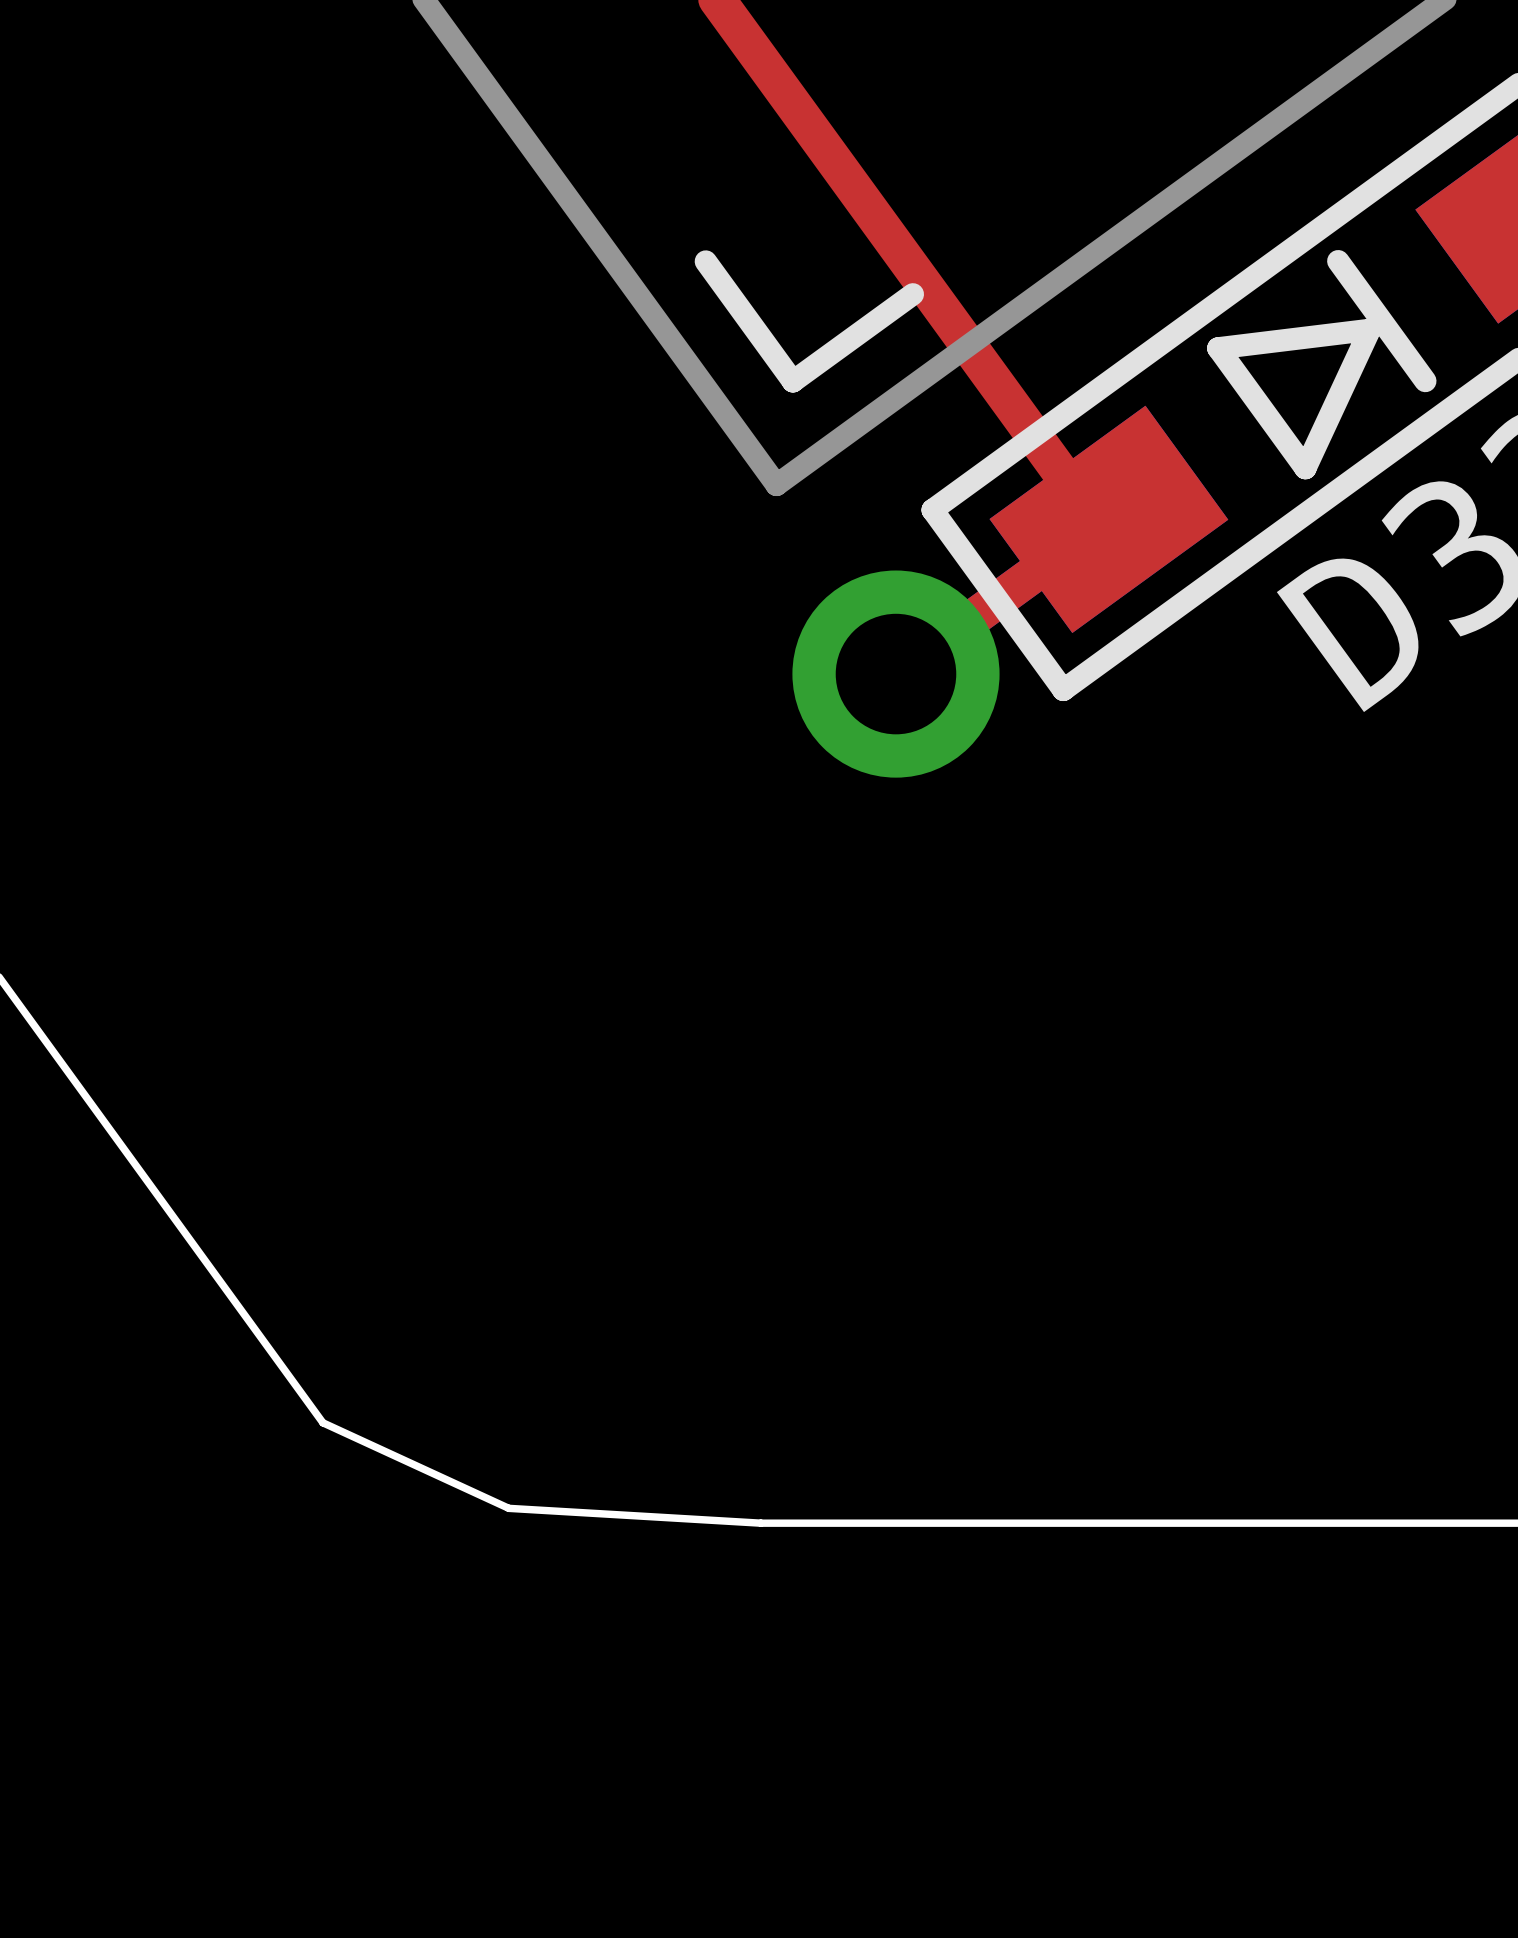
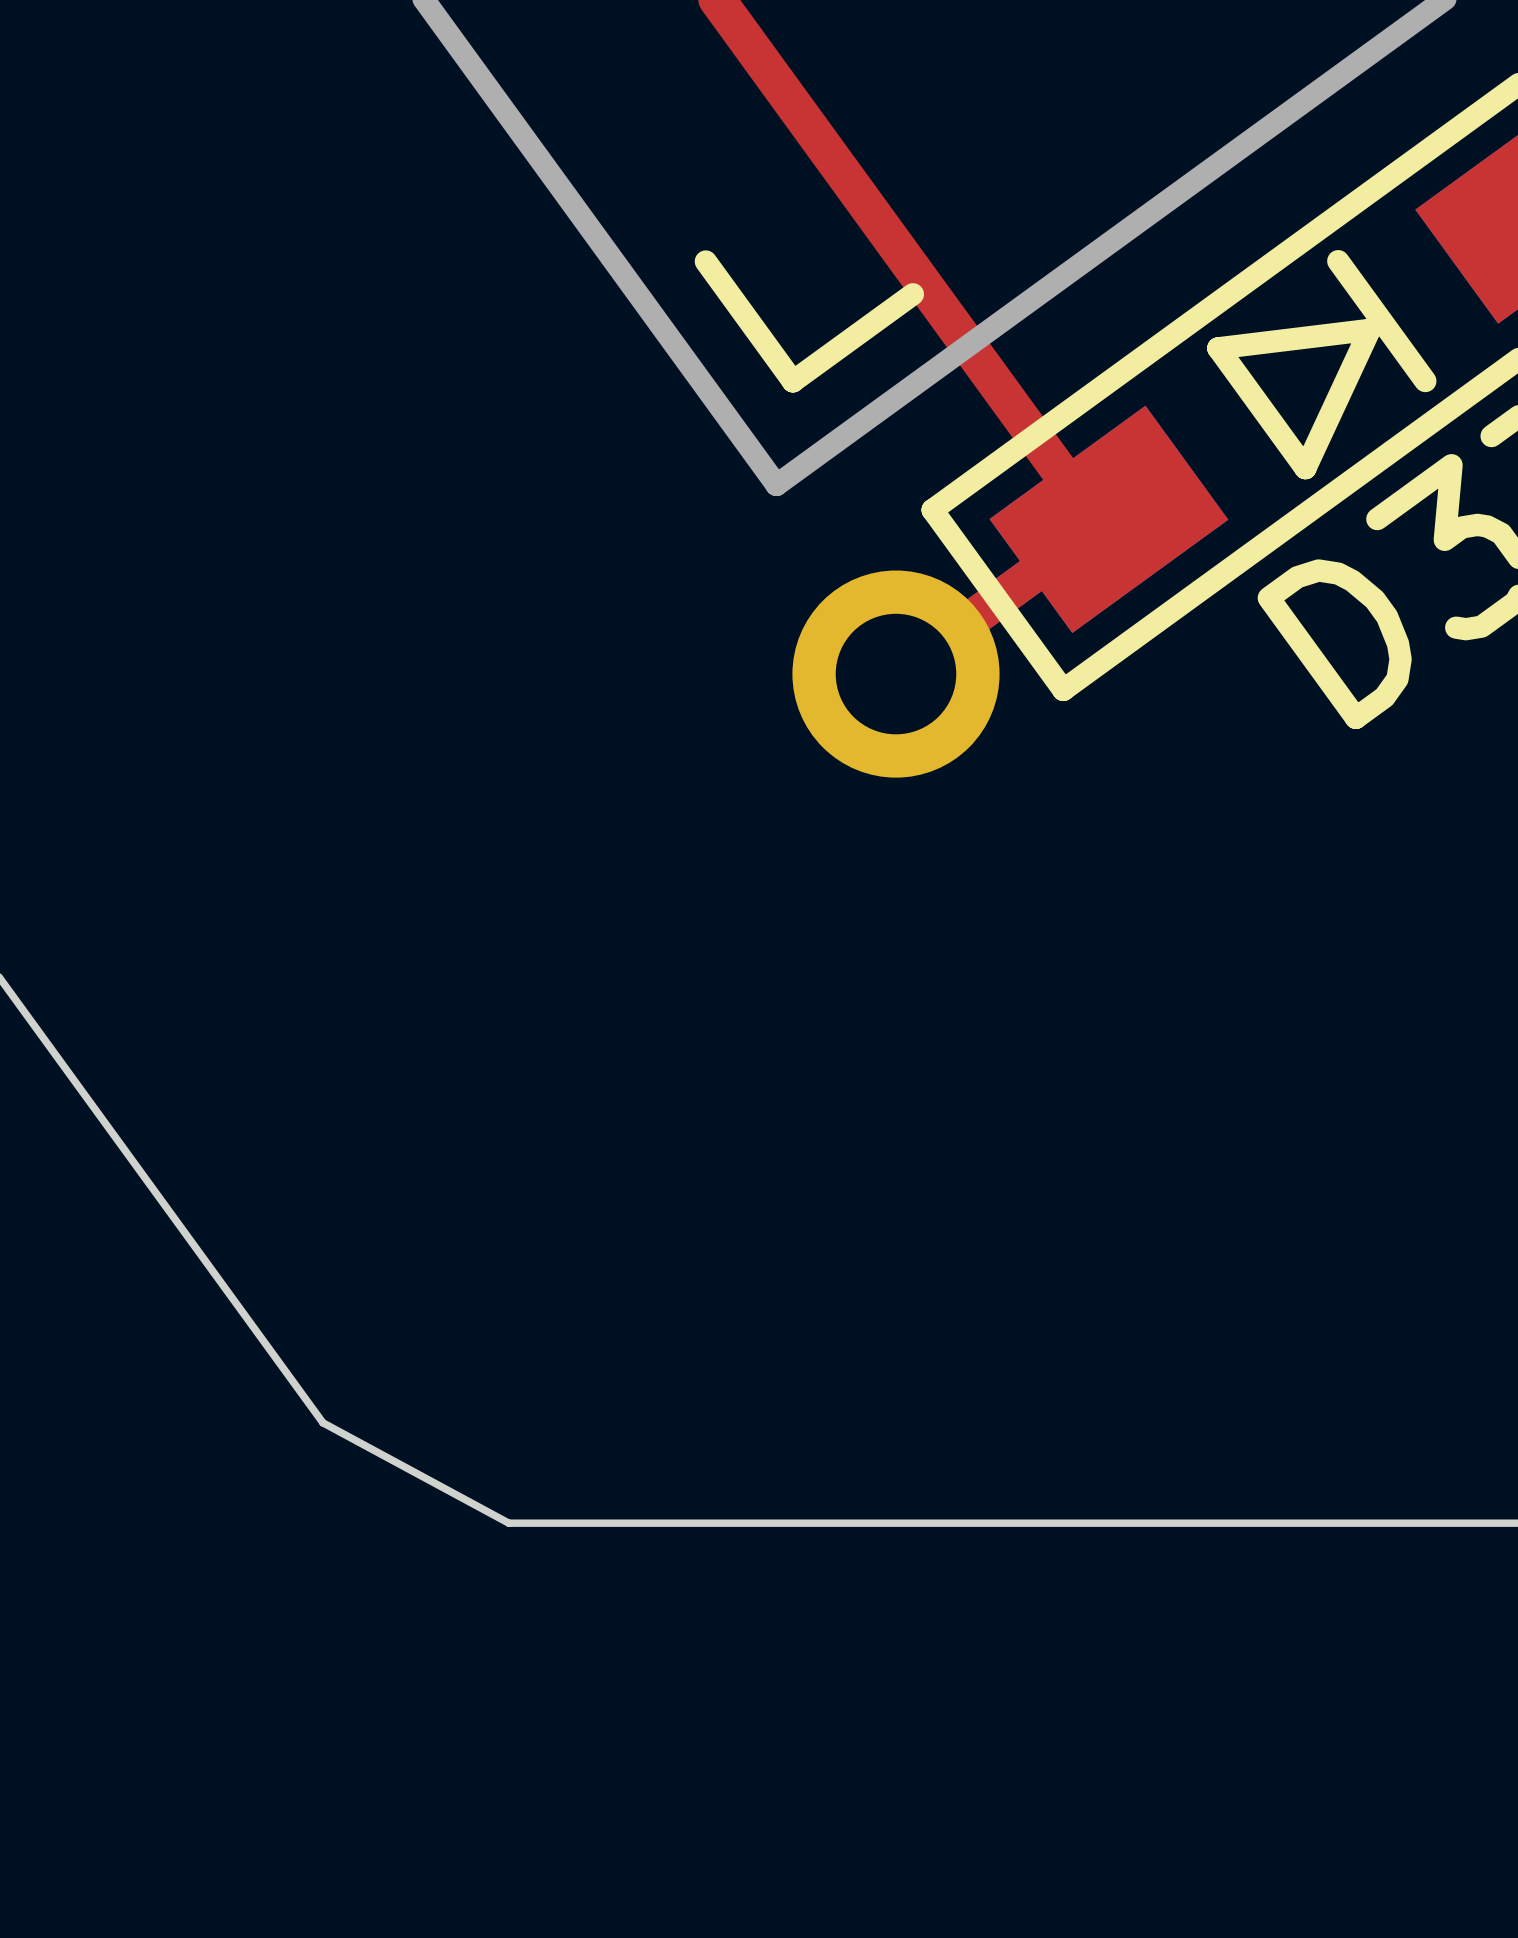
board edge: (322, 1422) (508, 1508) (760, 1523) -> (322, 1422) (508, 1523) (760, 1523)

